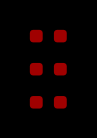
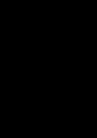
part: (48, 36) -> none
part: (48, 69) -> none
part: (48, 102) -> none

